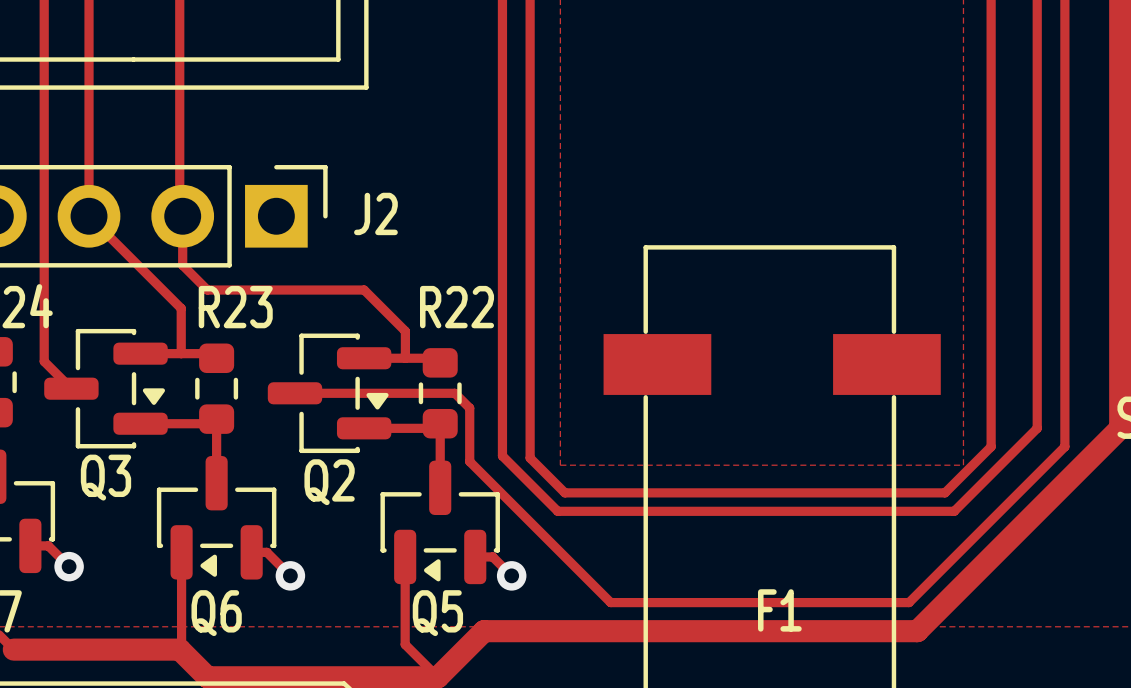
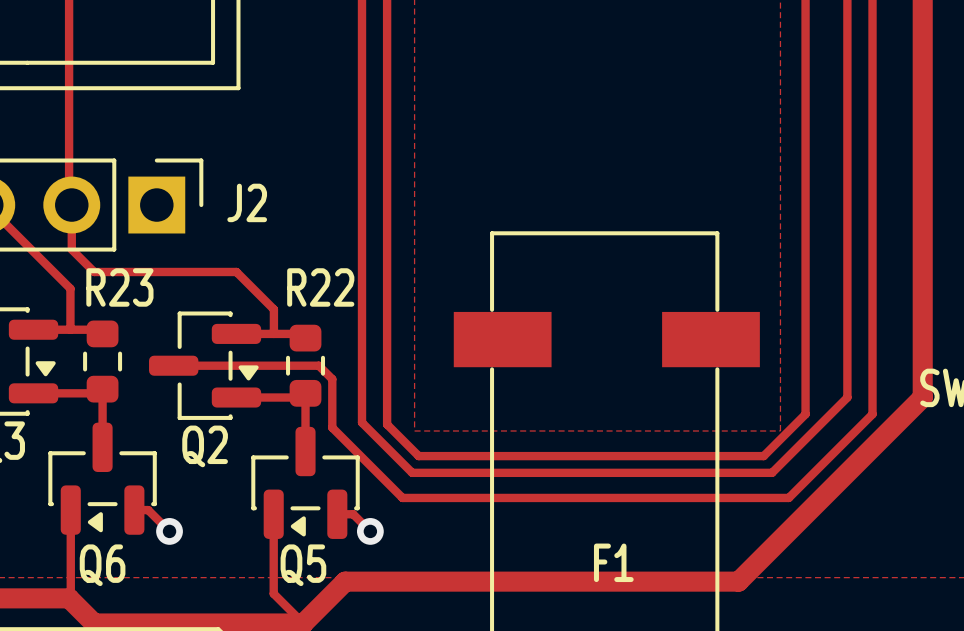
top track: (547, 538) (610, 602) (909, 602) (972, 538) -> (402, 497) (788, 497)

